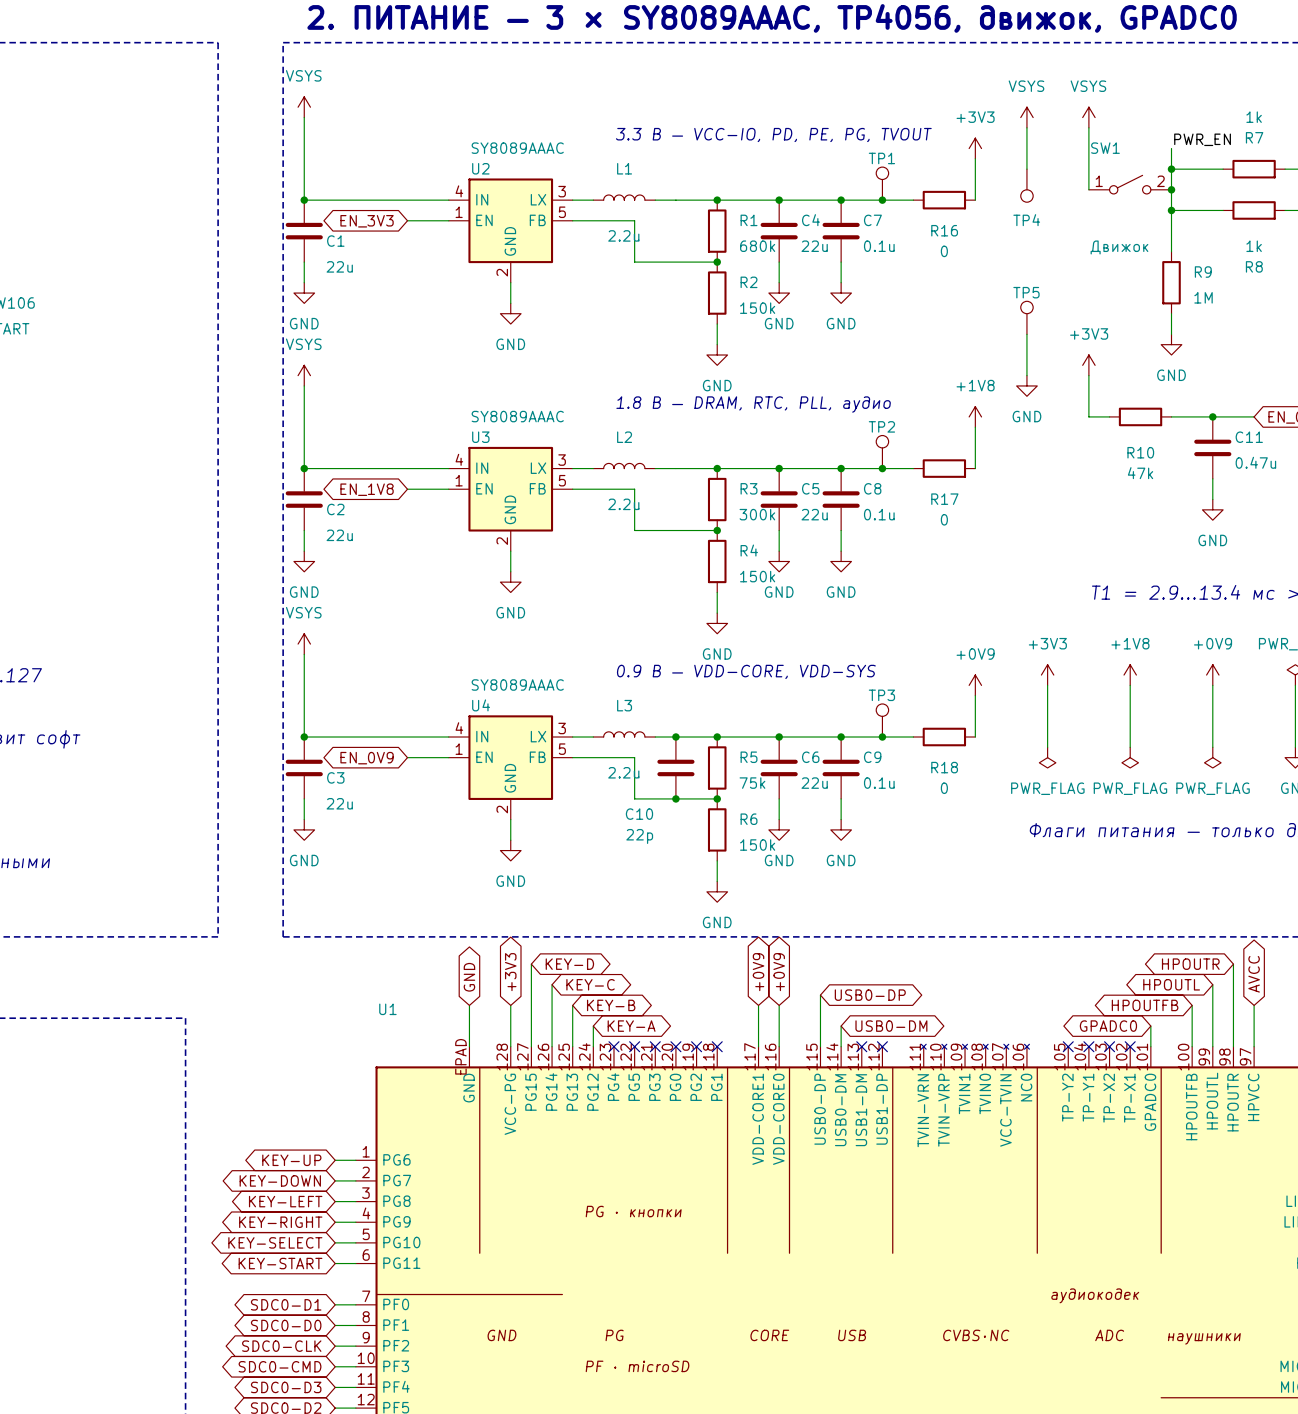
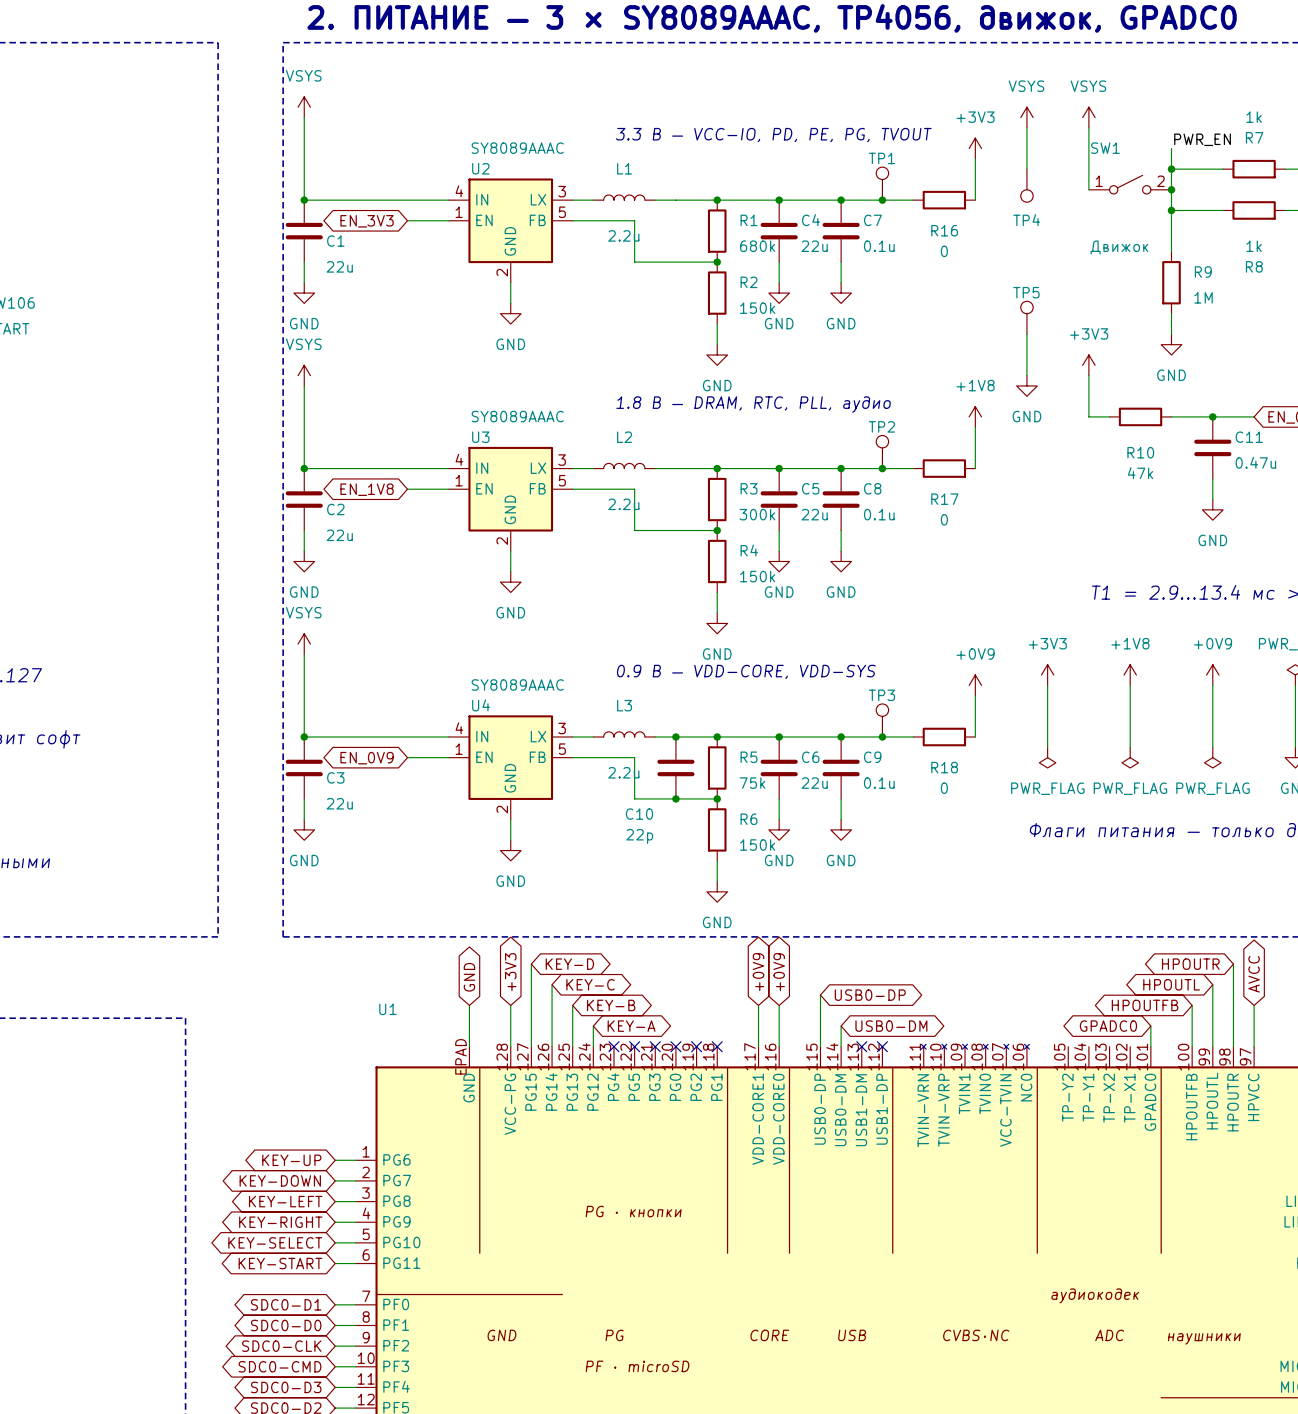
no-connect mark: (1068, 1046) -> none
no-connect mark: (1088, 1046) -> none
no-connect mark: (1109, 1046) -> none
no-connect mark: (1130, 1046) -> none

